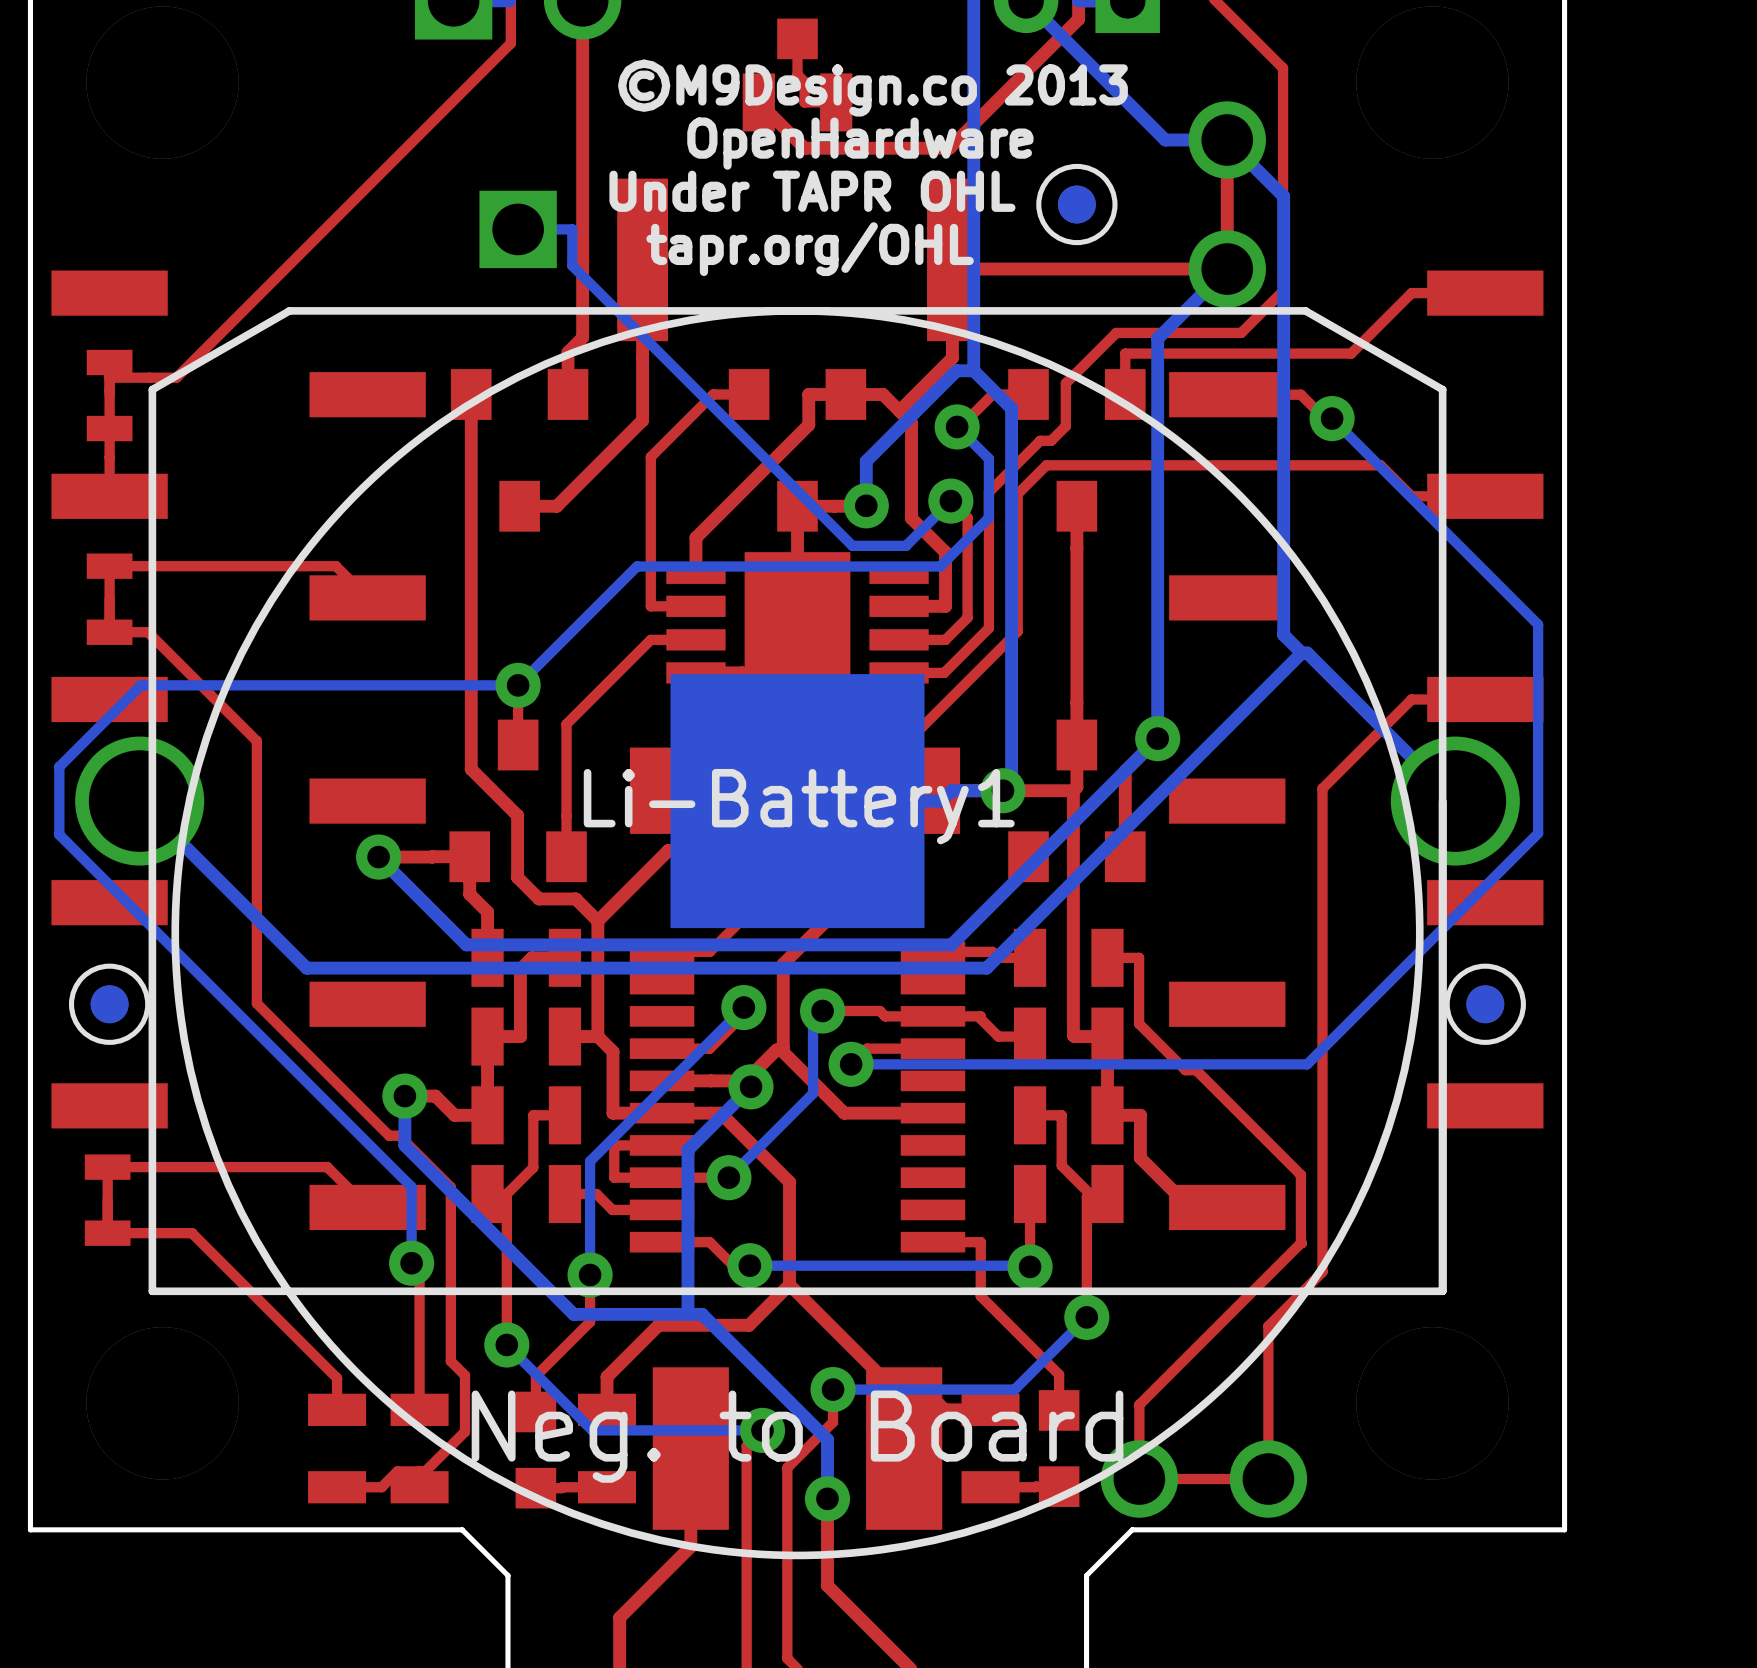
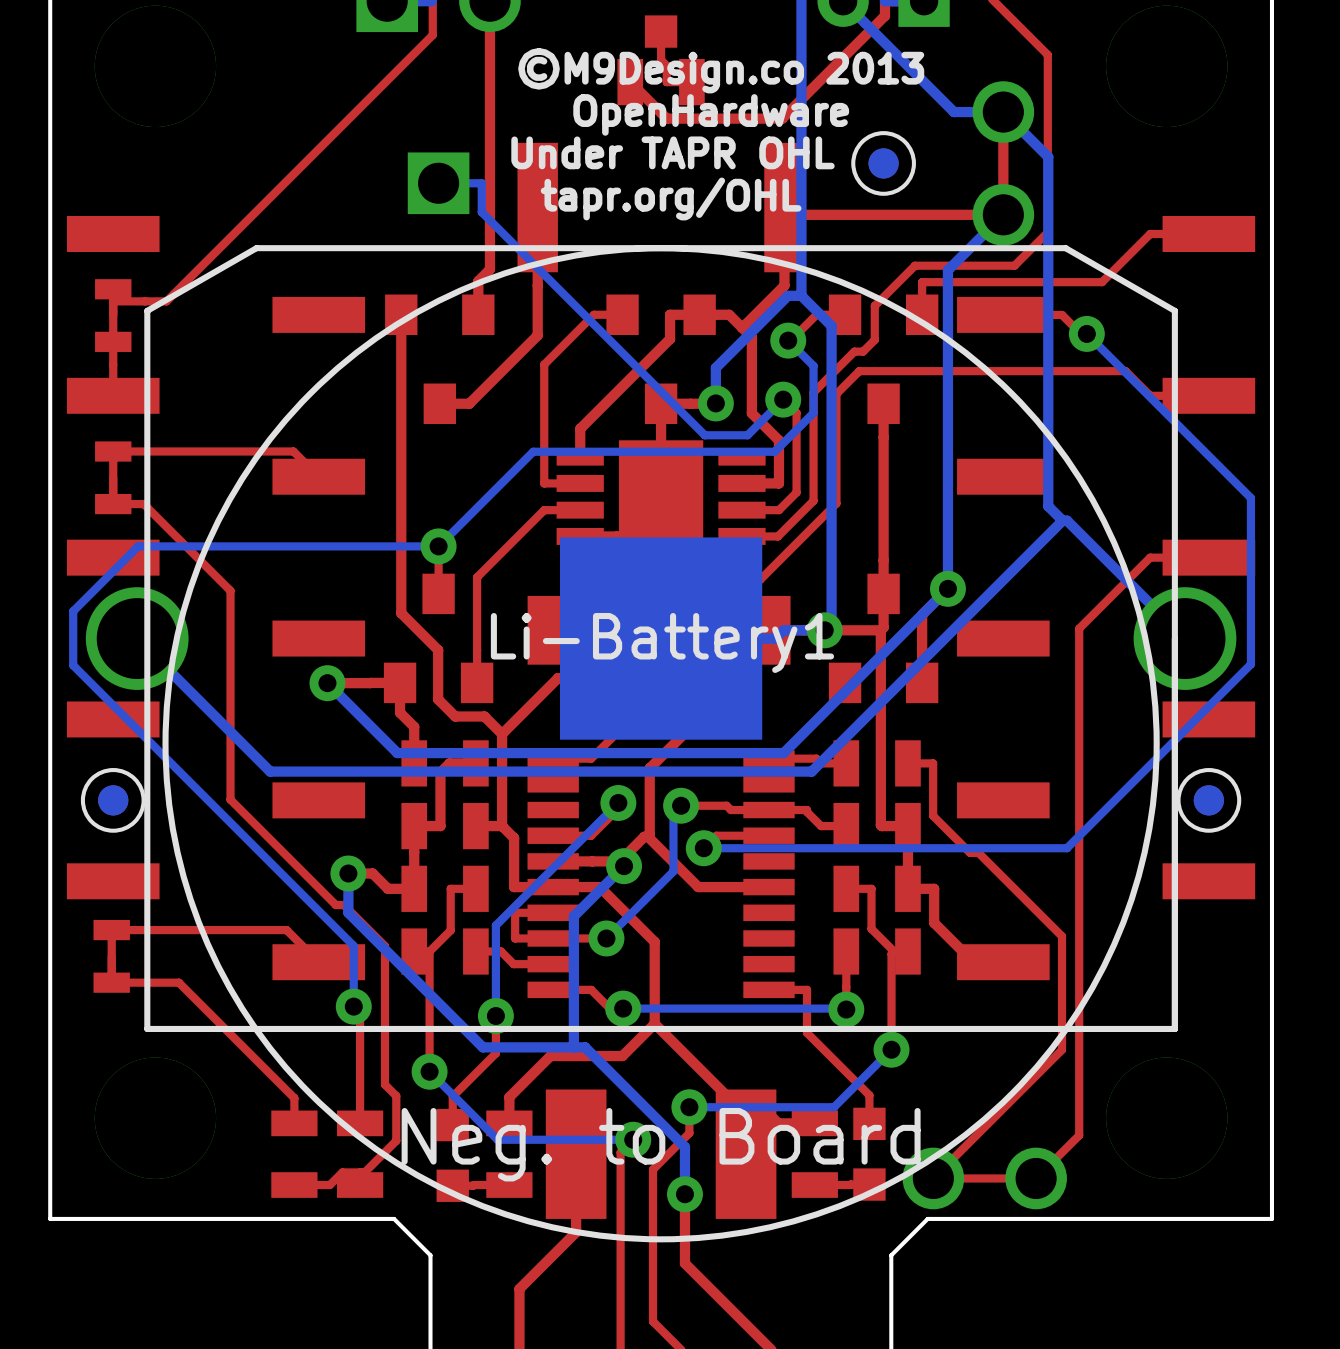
top track: (1300, 1243) (1139, 1404) (1139, 1479) -> (1062, 990) (1062, 1049) (933, 1178)
top track: (1322, 1272) (1268, 1326) (1268, 1479) -> (1079, 1013) (1079, 1135) (1036, 1178)

